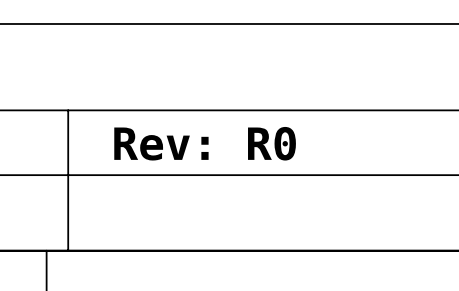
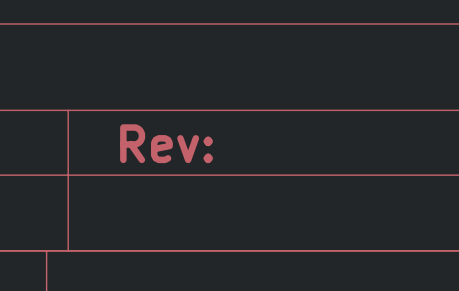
title block: Rev: R0 (205, 143) -> Rev: (166, 143)

